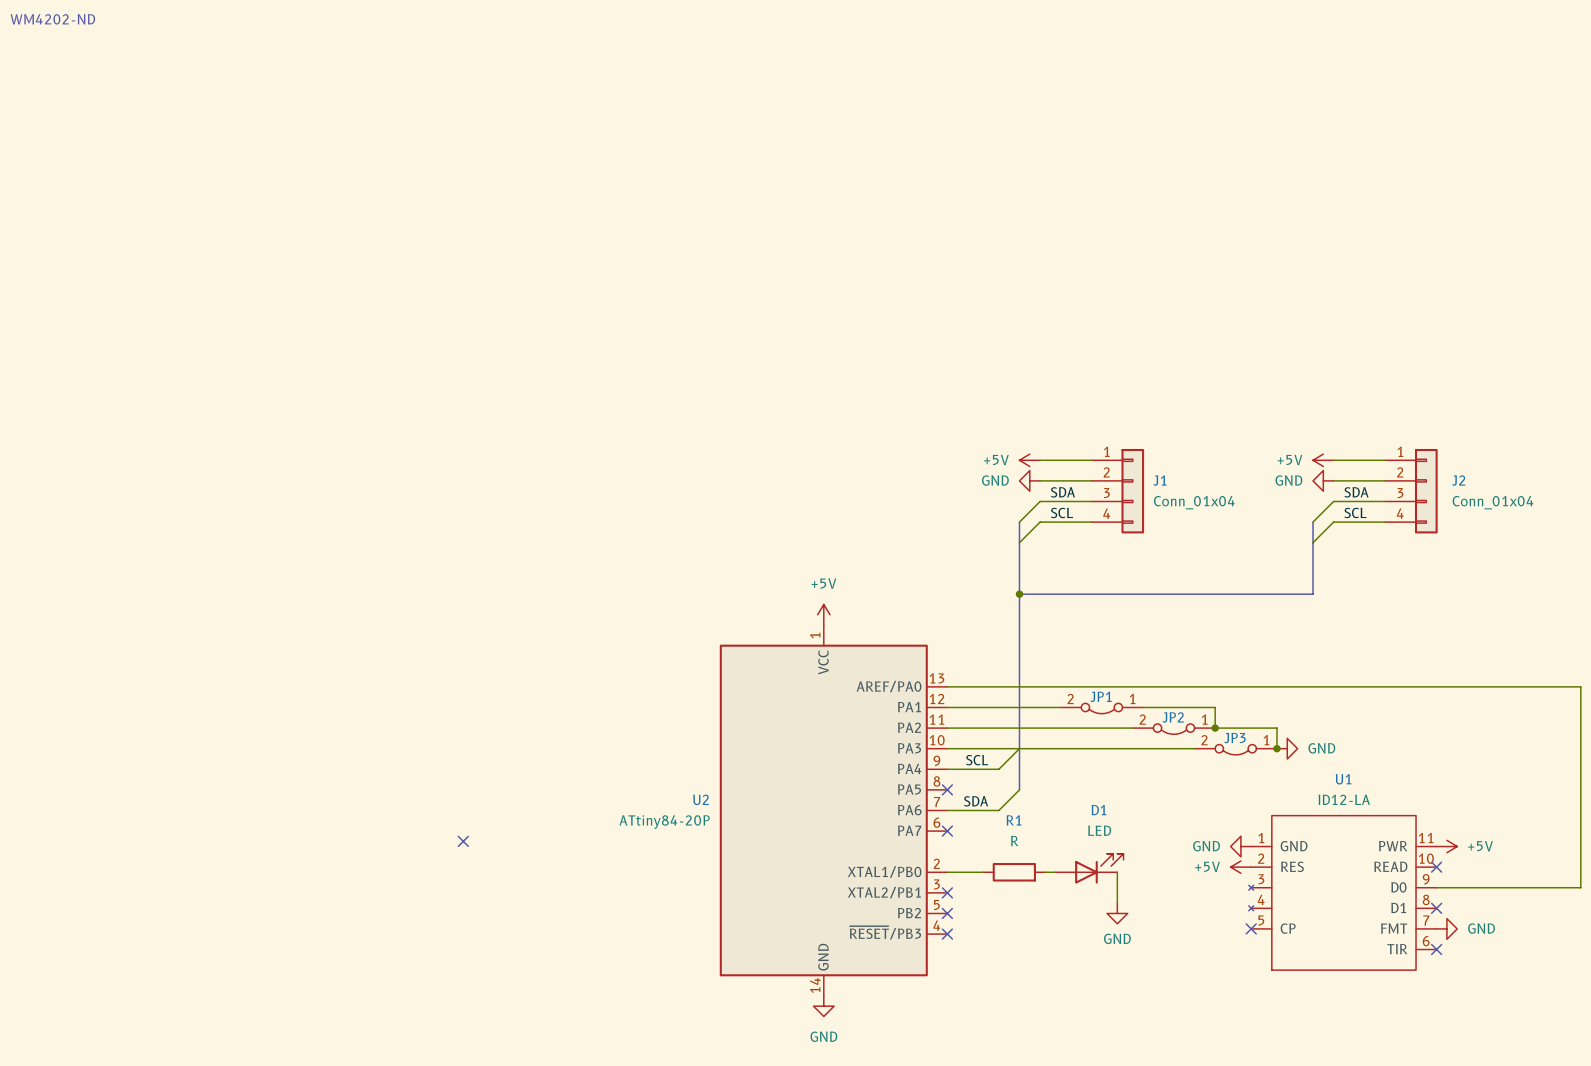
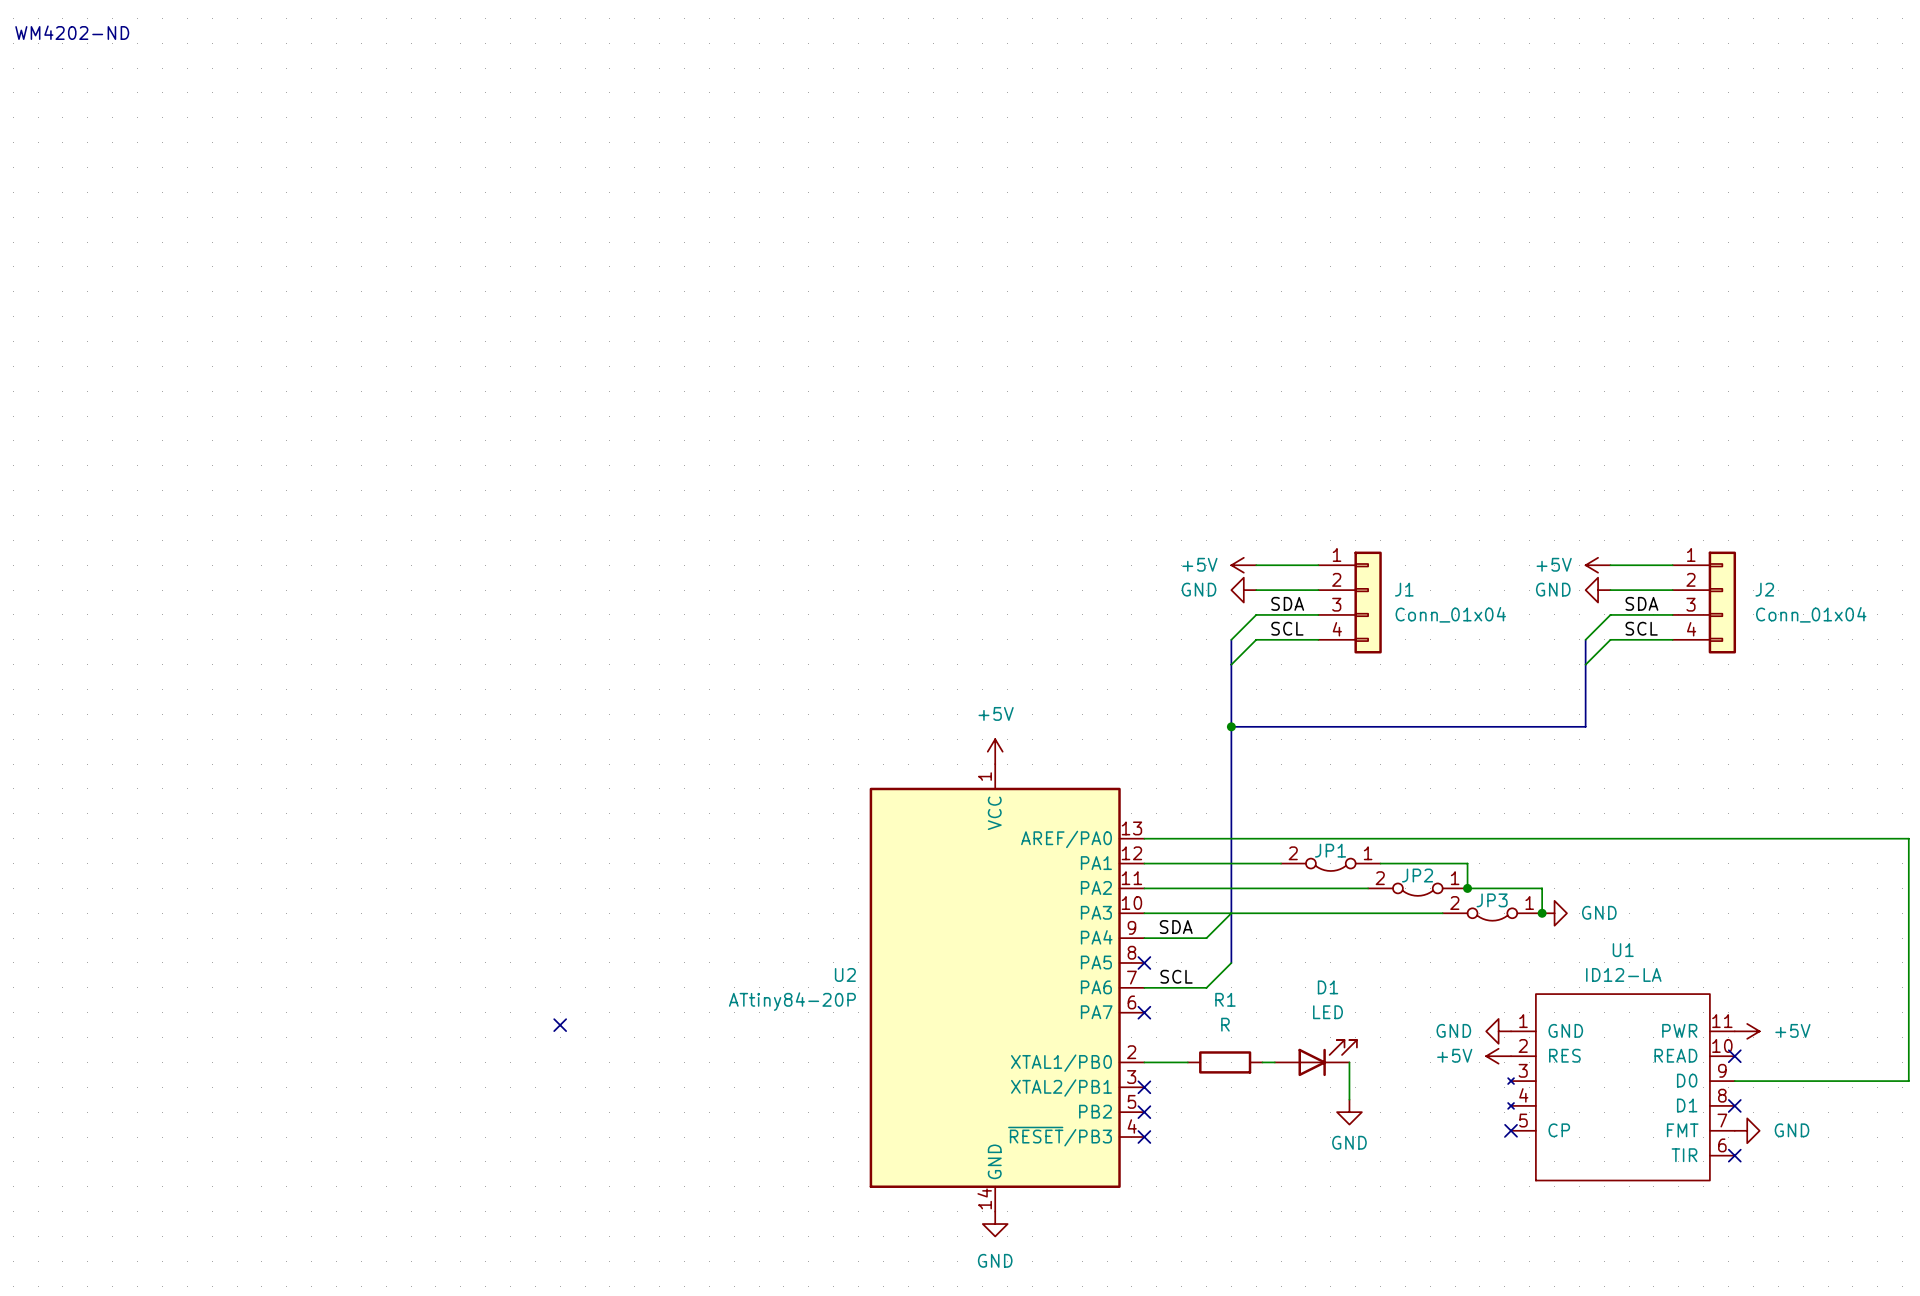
label: SCL (977, 760) -> SDA (1176, 927)
label: SDA (976, 801) -> SCL (1176, 976)

